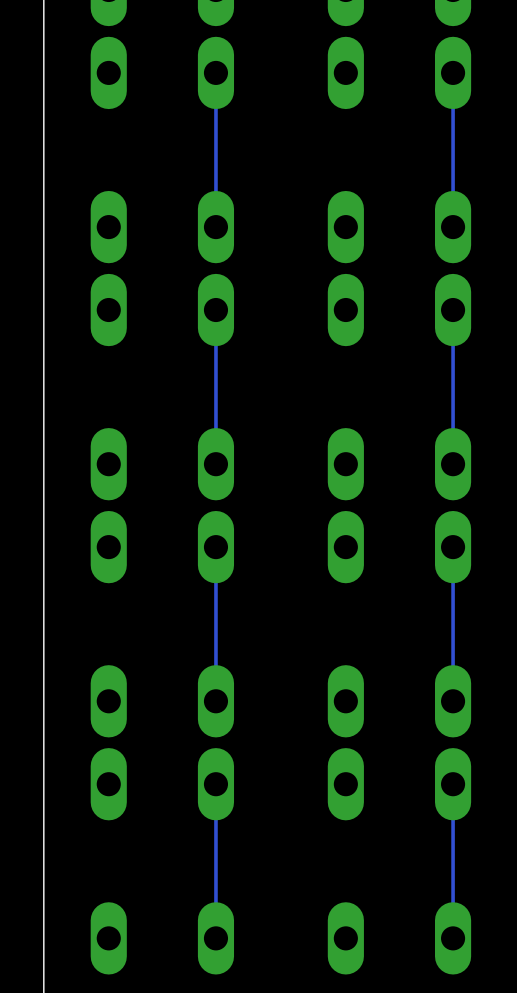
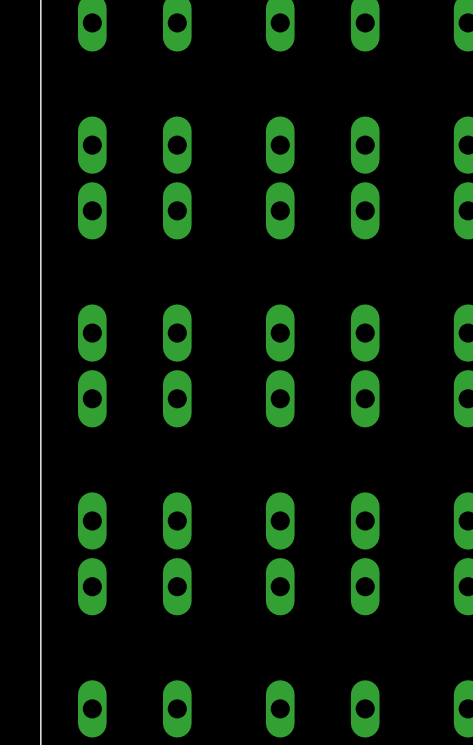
track: (215, 72) (215, 227) -> none
track: (453, 72) (453, 227) -> none
track: (215, 310) (215, 464) -> none
track: (453, 310) (453, 464) -> none
track: (215, 547) (215, 701) -> none
track: (453, 547) (453, 701) -> none
track: (215, 784) (215, 938) -> none
track: (453, 784) (453, 938) -> none

